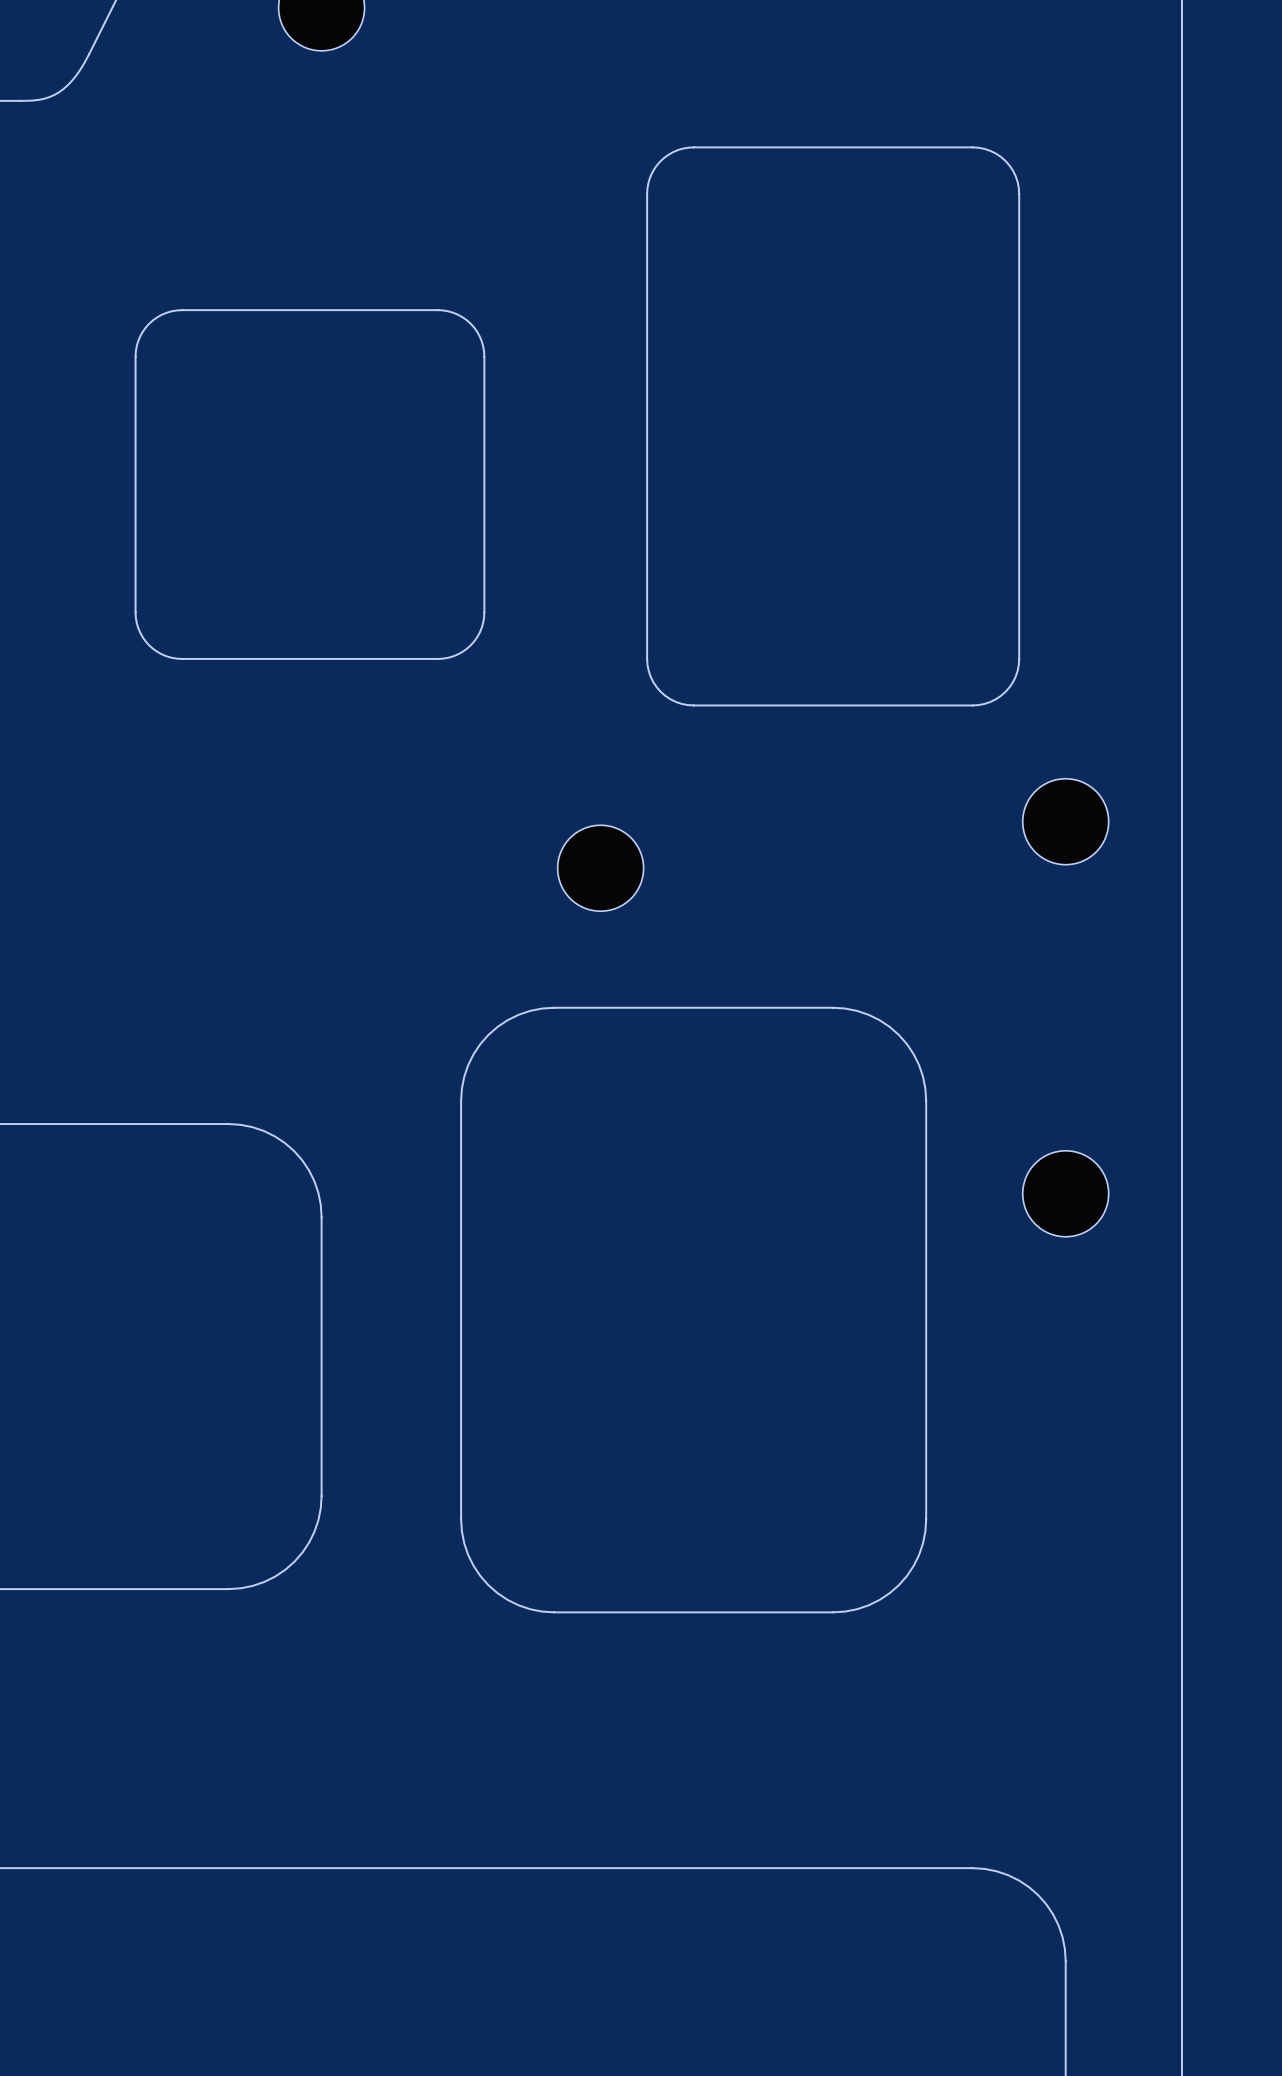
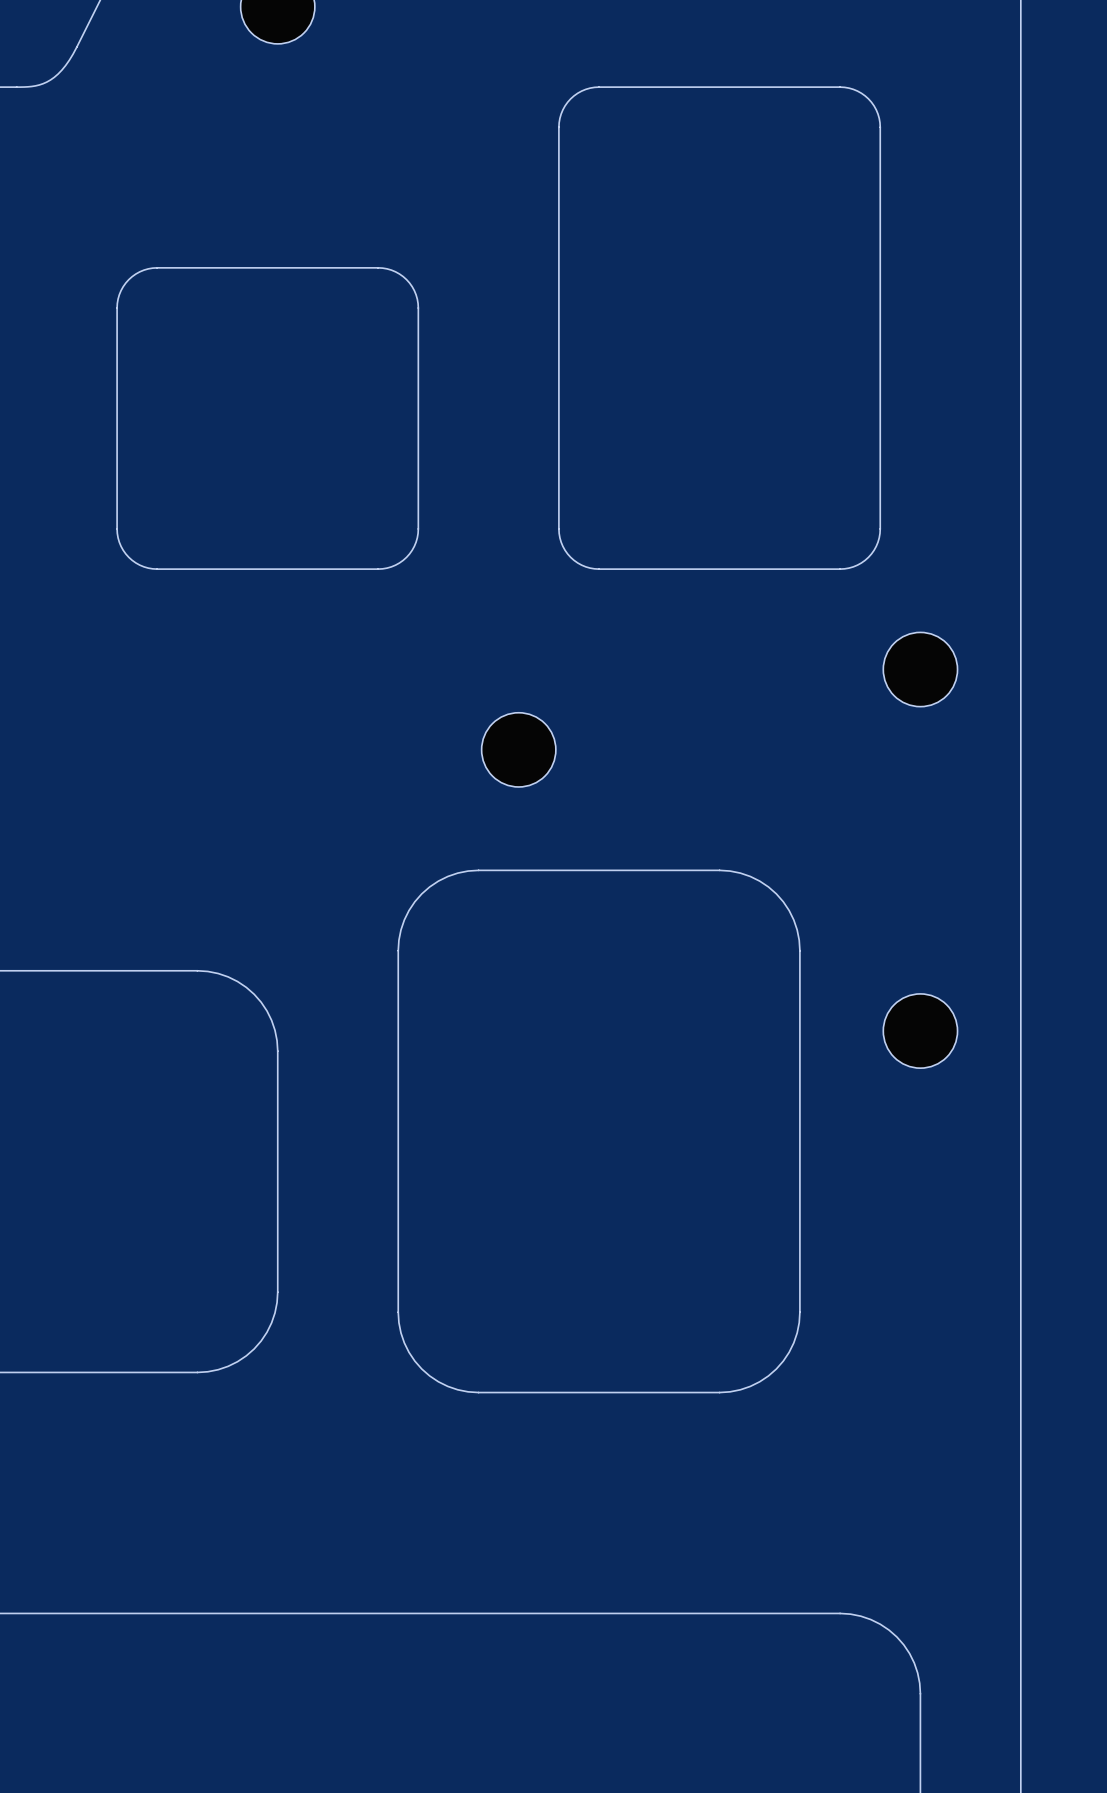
board edge: (647, 193) (649, 178) (657, 164) (668, 154) (688, 147) (972, 147) (990, 150) (1005, 161) (1015, 176) (1019, 193) -> (558, 167) (558, 127) (561, 114) (570, 98) (577, 93) (590, 88) (840, 87) (849, 88) (861, 93) (871, 102) (876, 109) (879, 122) (880, 167)
board edge: (647, 612) (647, 665) (653, 682) (660, 691) (670, 699) (681, 703) (693, 705) (972, 705) (984, 703) (995, 699) (1005, 691) (1015, 676) (1019, 658) (1019, 612) -> (558, 528) (562, 546) (570, 557) (585, 566) (599, 569) (844, 568) (857, 565) (871, 553) (877, 542) (880, 528)
part position: (1065, 821) -> (920, 669)

